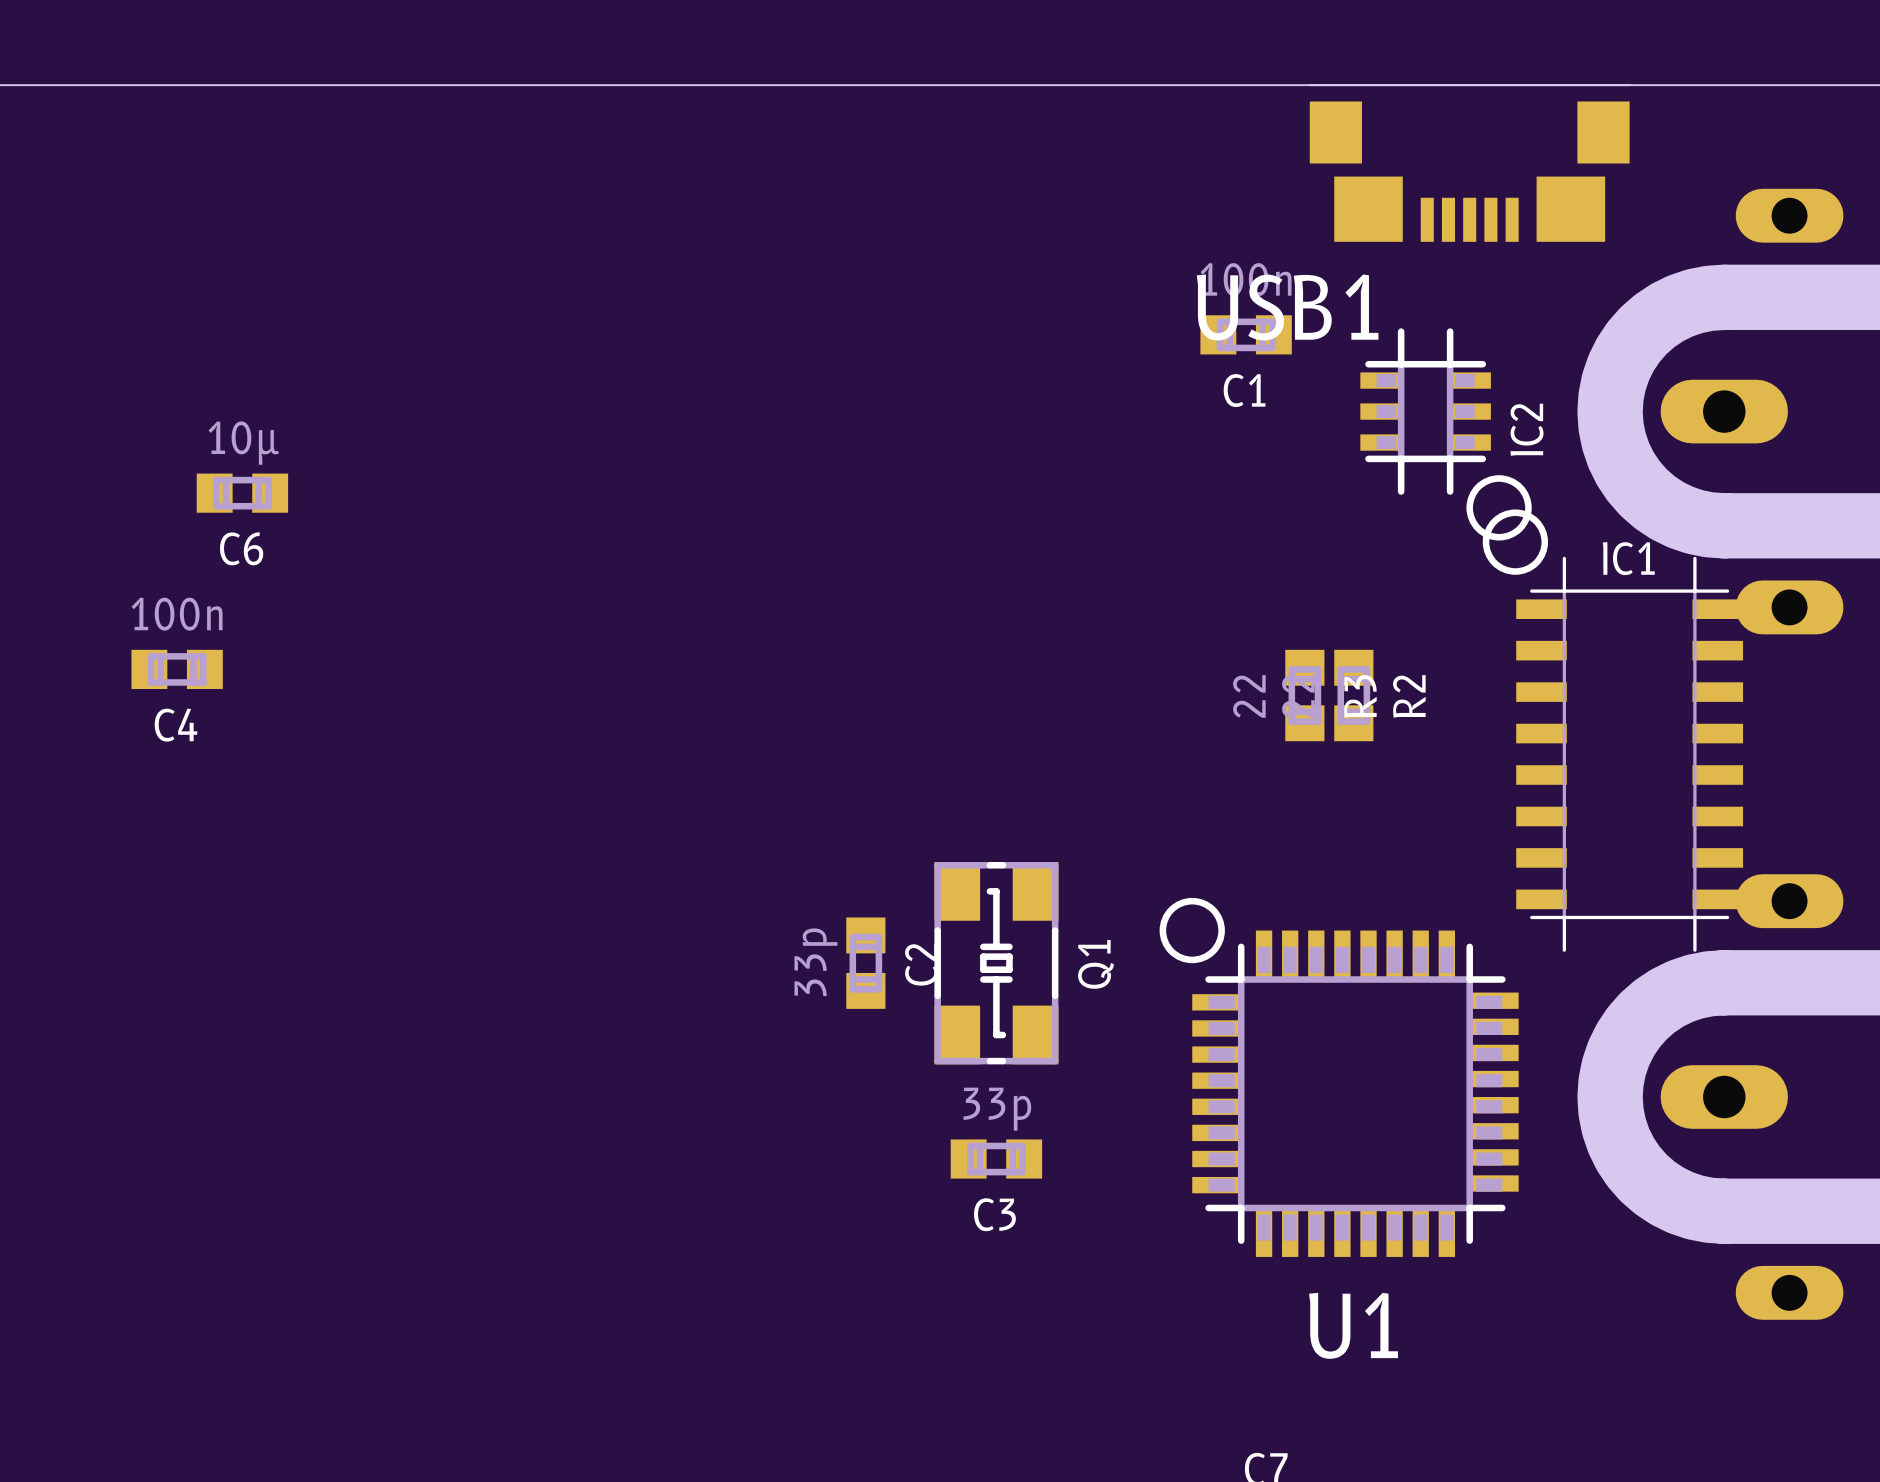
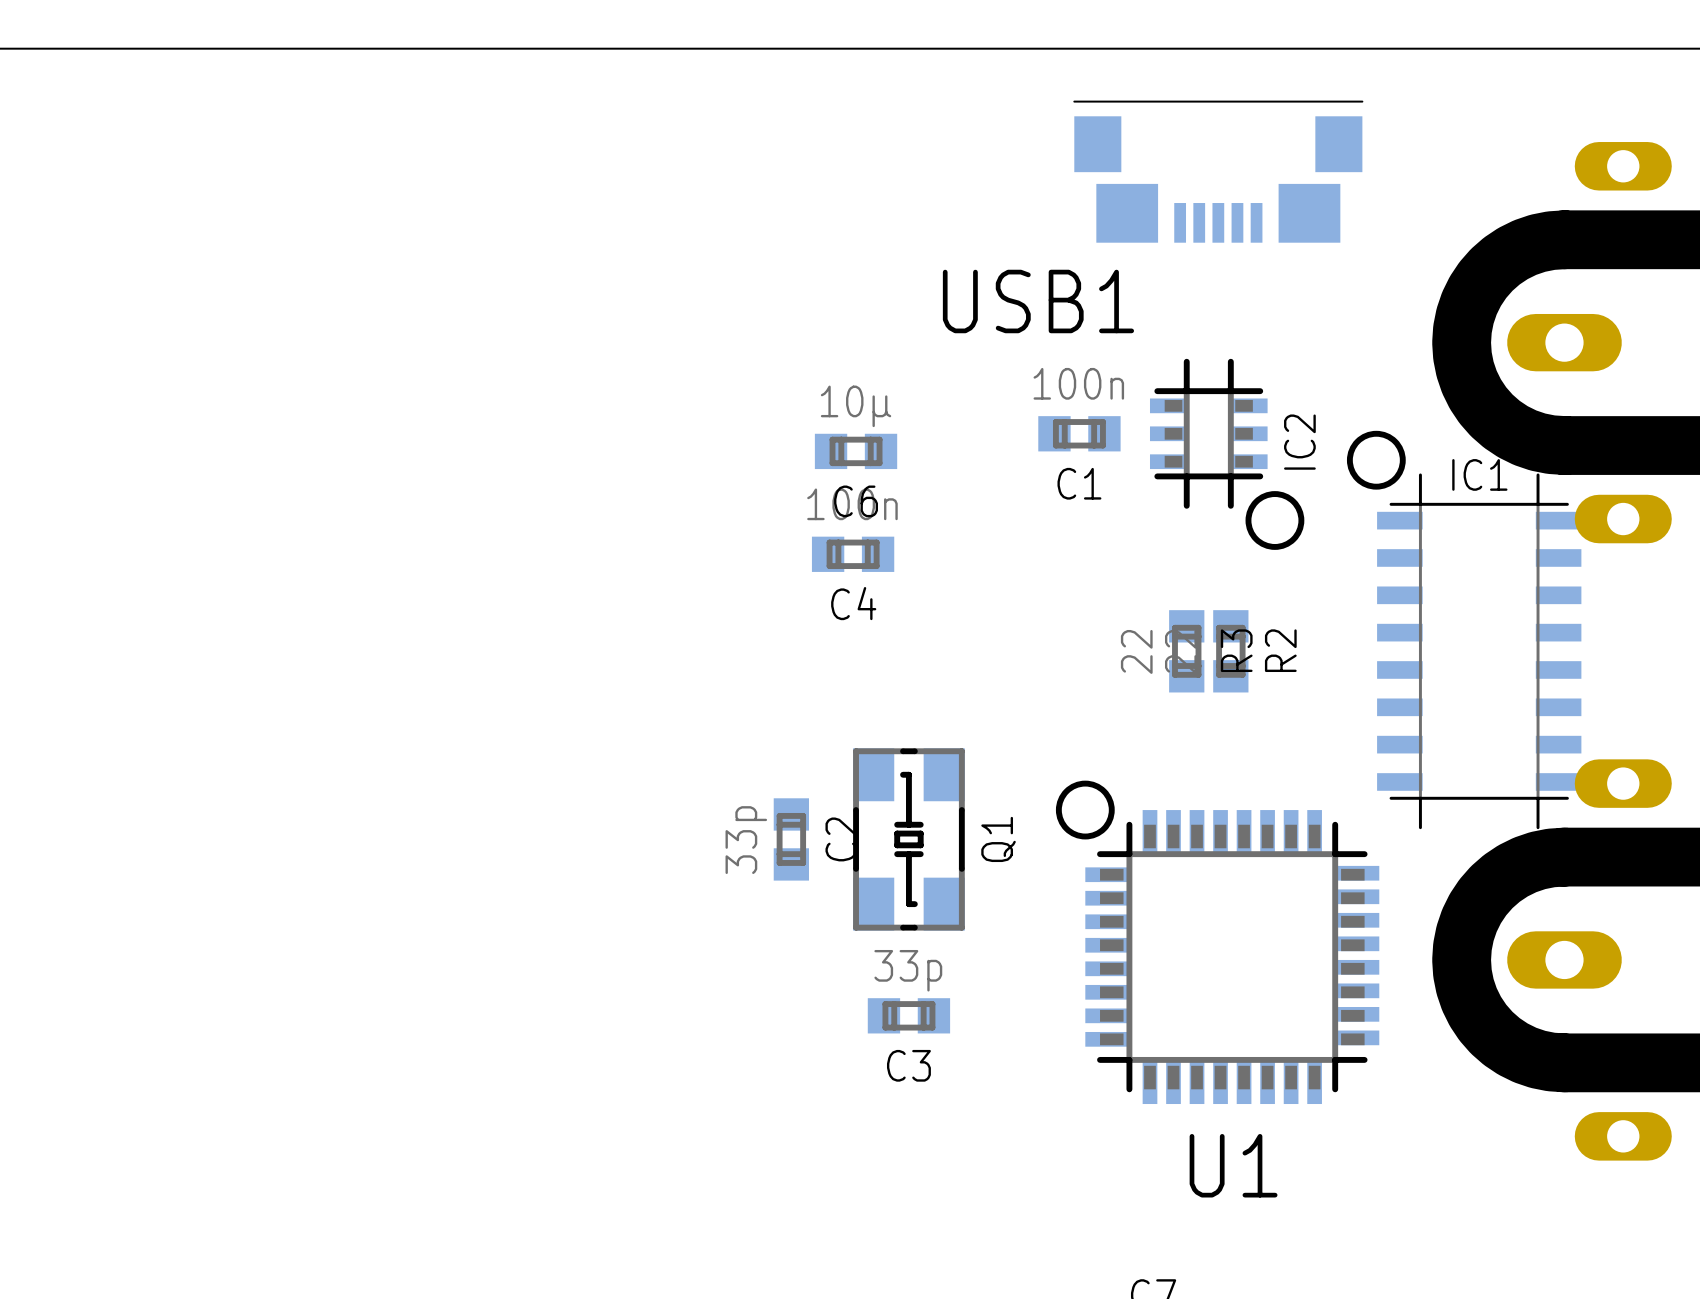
USB1 position: (1469, 163) -> (1218, 171)
C1 position: (1246, 334) -> (1079, 433)
IC2 position: (1446, 434) -> (1227, 454)
C6 position: (242, 493) -> (856, 451)
C4 position: (177, 669) -> (853, 554)
R3 position: (1304, 695) -> (1186, 651)
R2 position: (1353, 695) -> (1230, 651)

